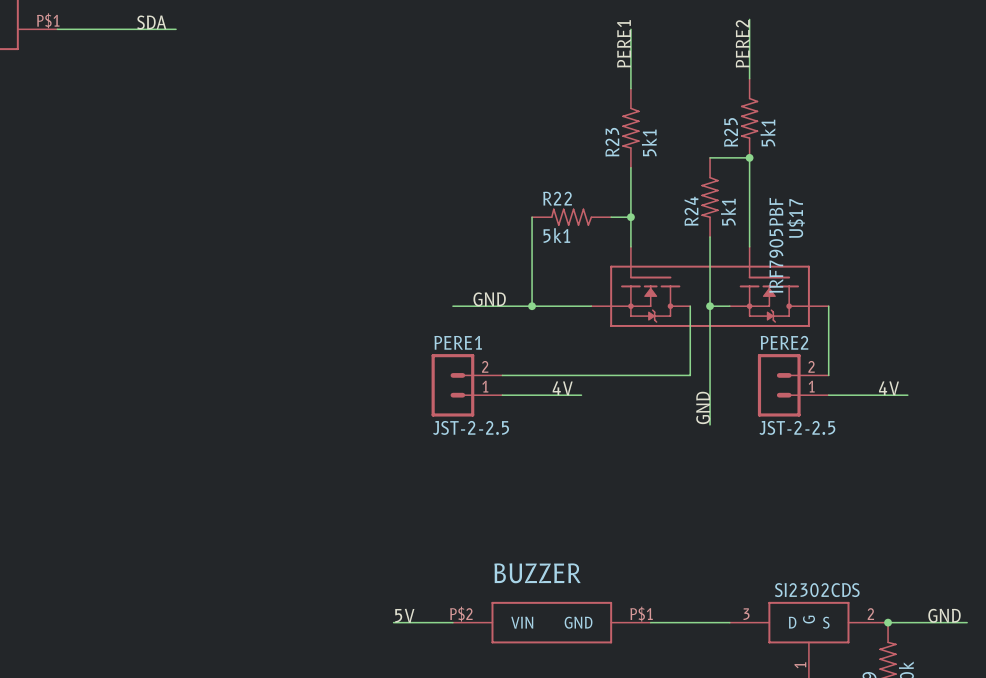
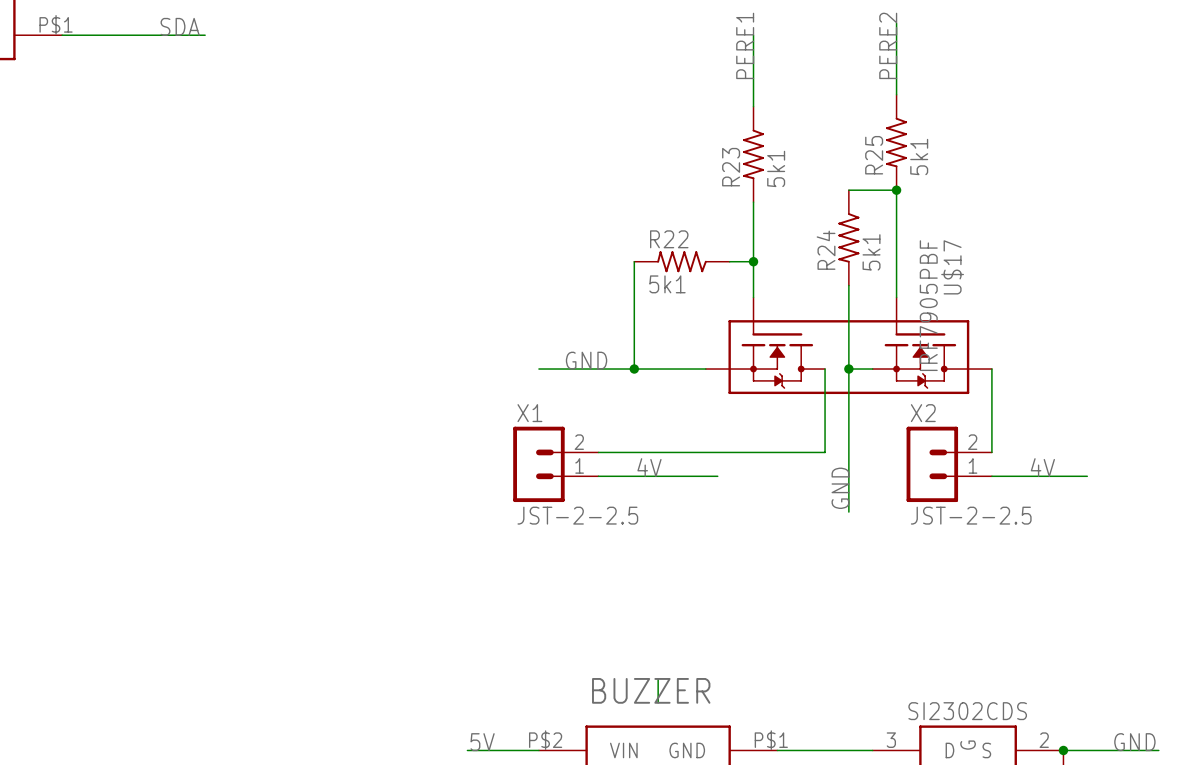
PERE1 name: PERE1 (458, 342) -> X1 (529, 413)
PERE2 name: PERE2 (784, 342) -> X2 (923, 413)
label position: 4V (562, 388) -> 4V (649, 467)
label position: 4V (888, 388) -> 4V (1042, 467)
wire: none -> (693, 476) (717, 476)
wire: none -> (658, 678) (658, 702)

